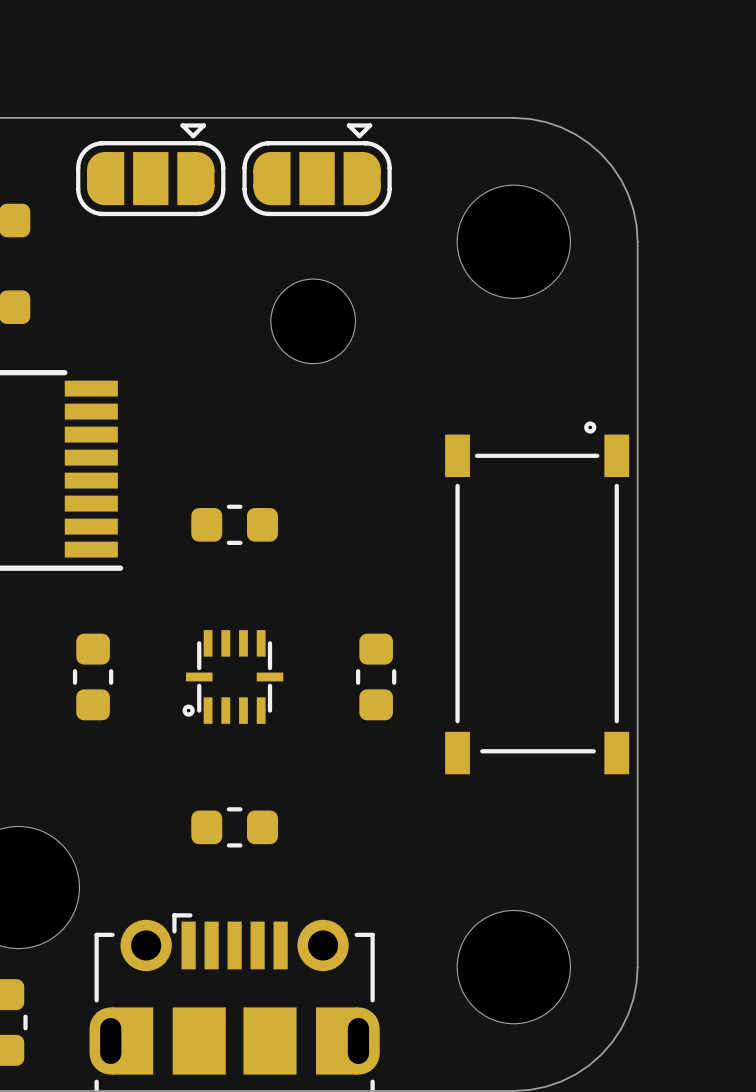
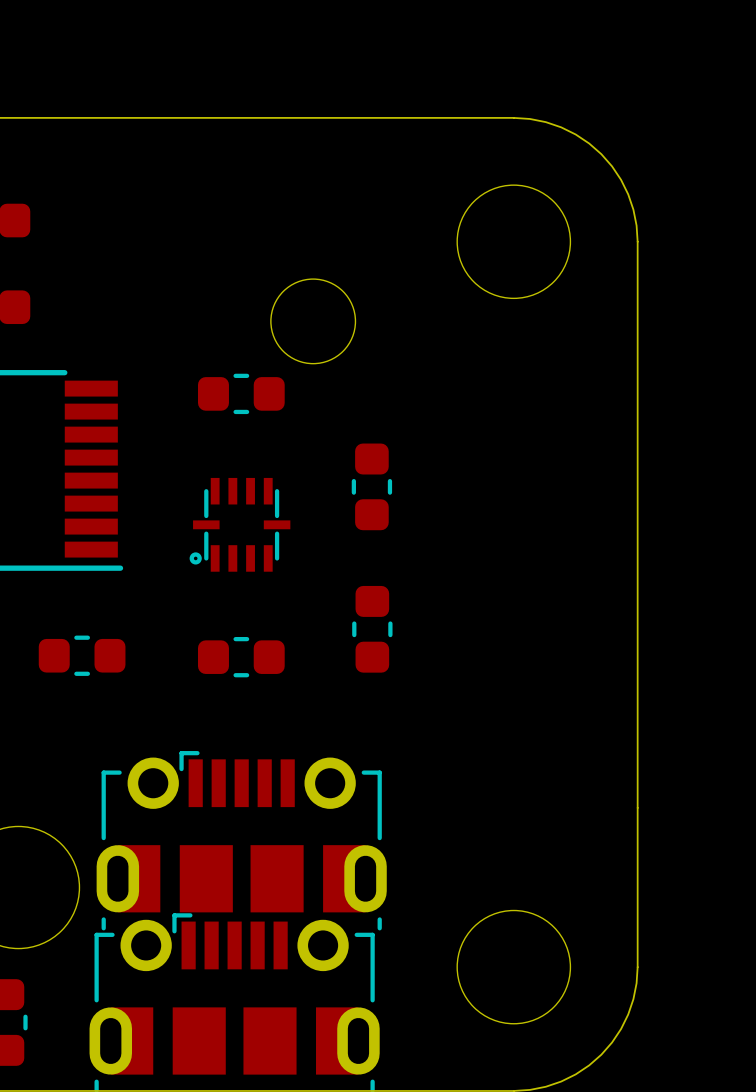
part: (150, 169) -> none
part: (317, 169) -> none
part: none -> (241, 393)
part: none -> (371, 486)
part footprint: [191, 504, 278, 545] -> [189, 477, 291, 572]
part: (537, 597) -> none
part footprint: [182, 630, 284, 724] -> [198, 636, 285, 678]
part rotation: 0° (93, 676) -> 90° clockwise (82, 655)
part position: (376, 676) -> (372, 629)
part footprint: [191, 807, 278, 848] -> [96, 751, 387, 931]

